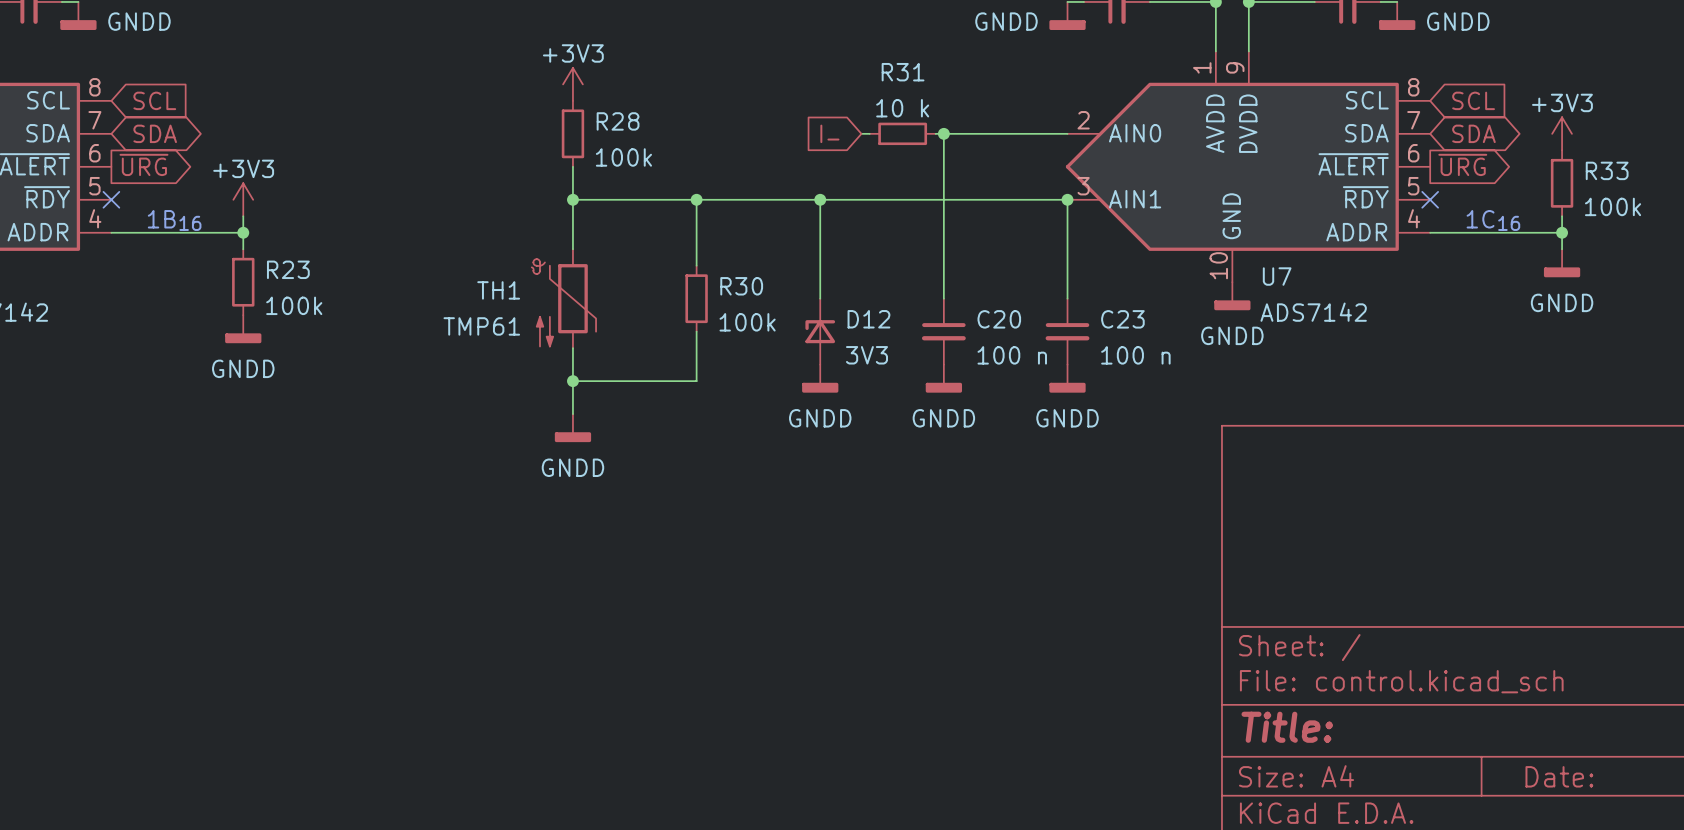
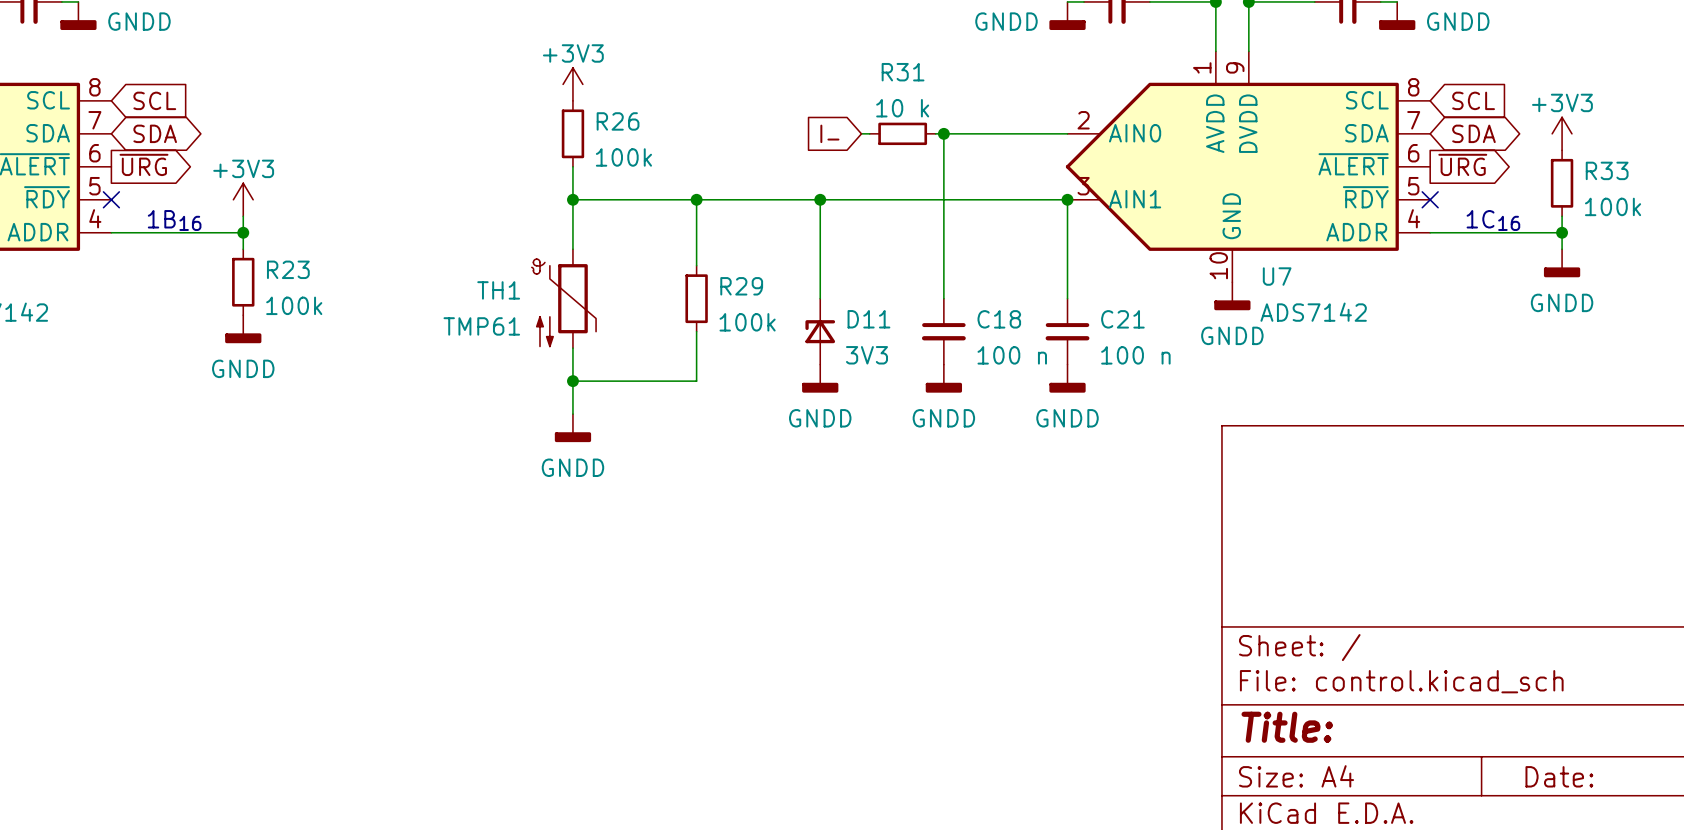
R28 name: R28 (618, 121) -> R26 (618, 121)
R30 name: R30 (741, 286) -> R29 (741, 286)
D12 name: D12 (868, 319) -> D11 (868, 319)
C20 name: C20 (999, 319) -> C18 (999, 319)
C23 name: C23 (1122, 319) -> C21 (1122, 319)

